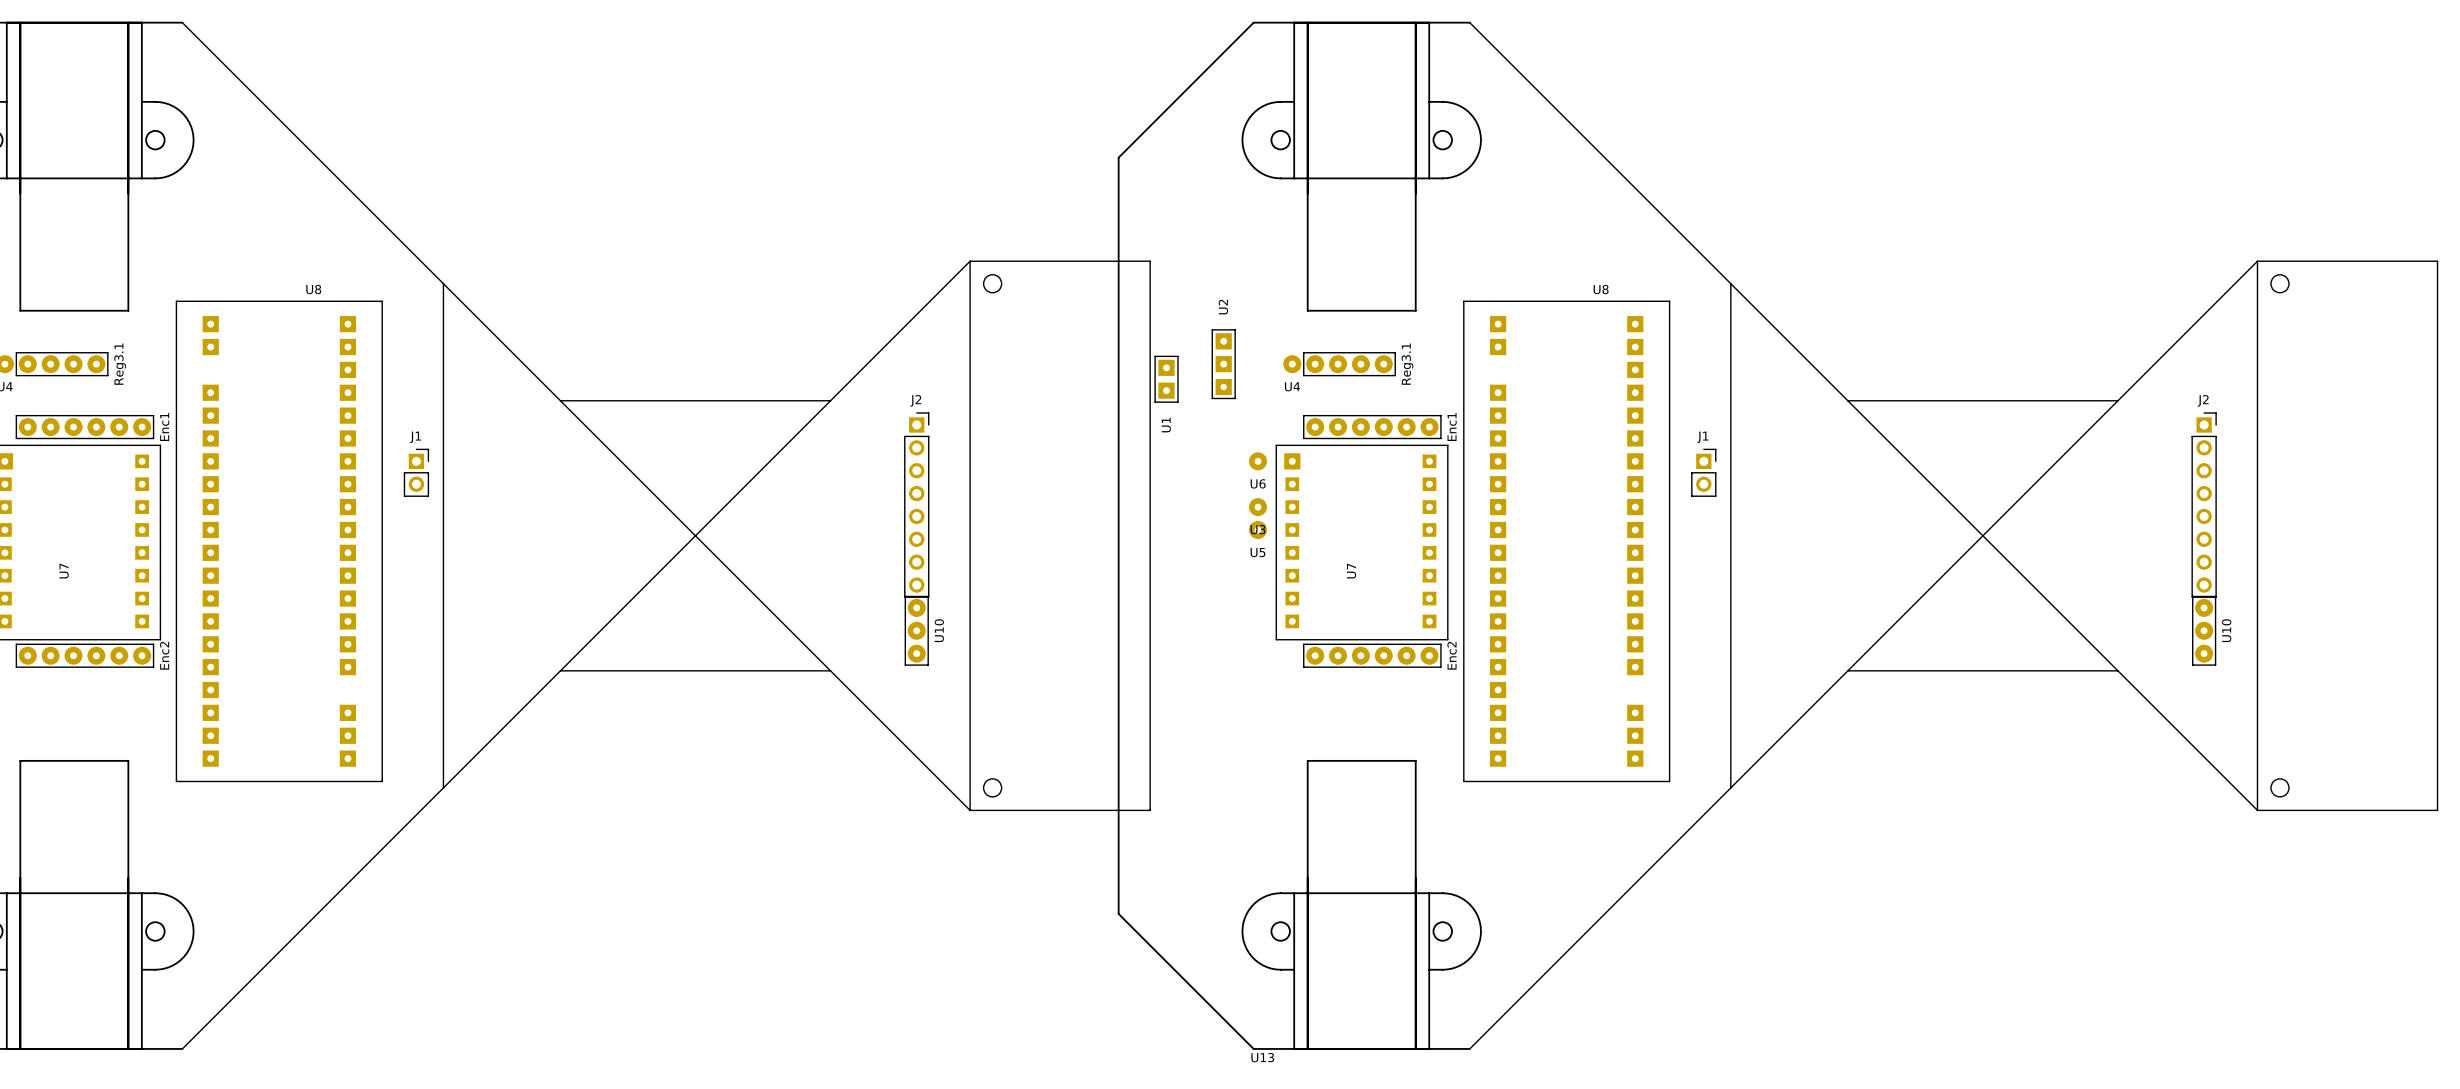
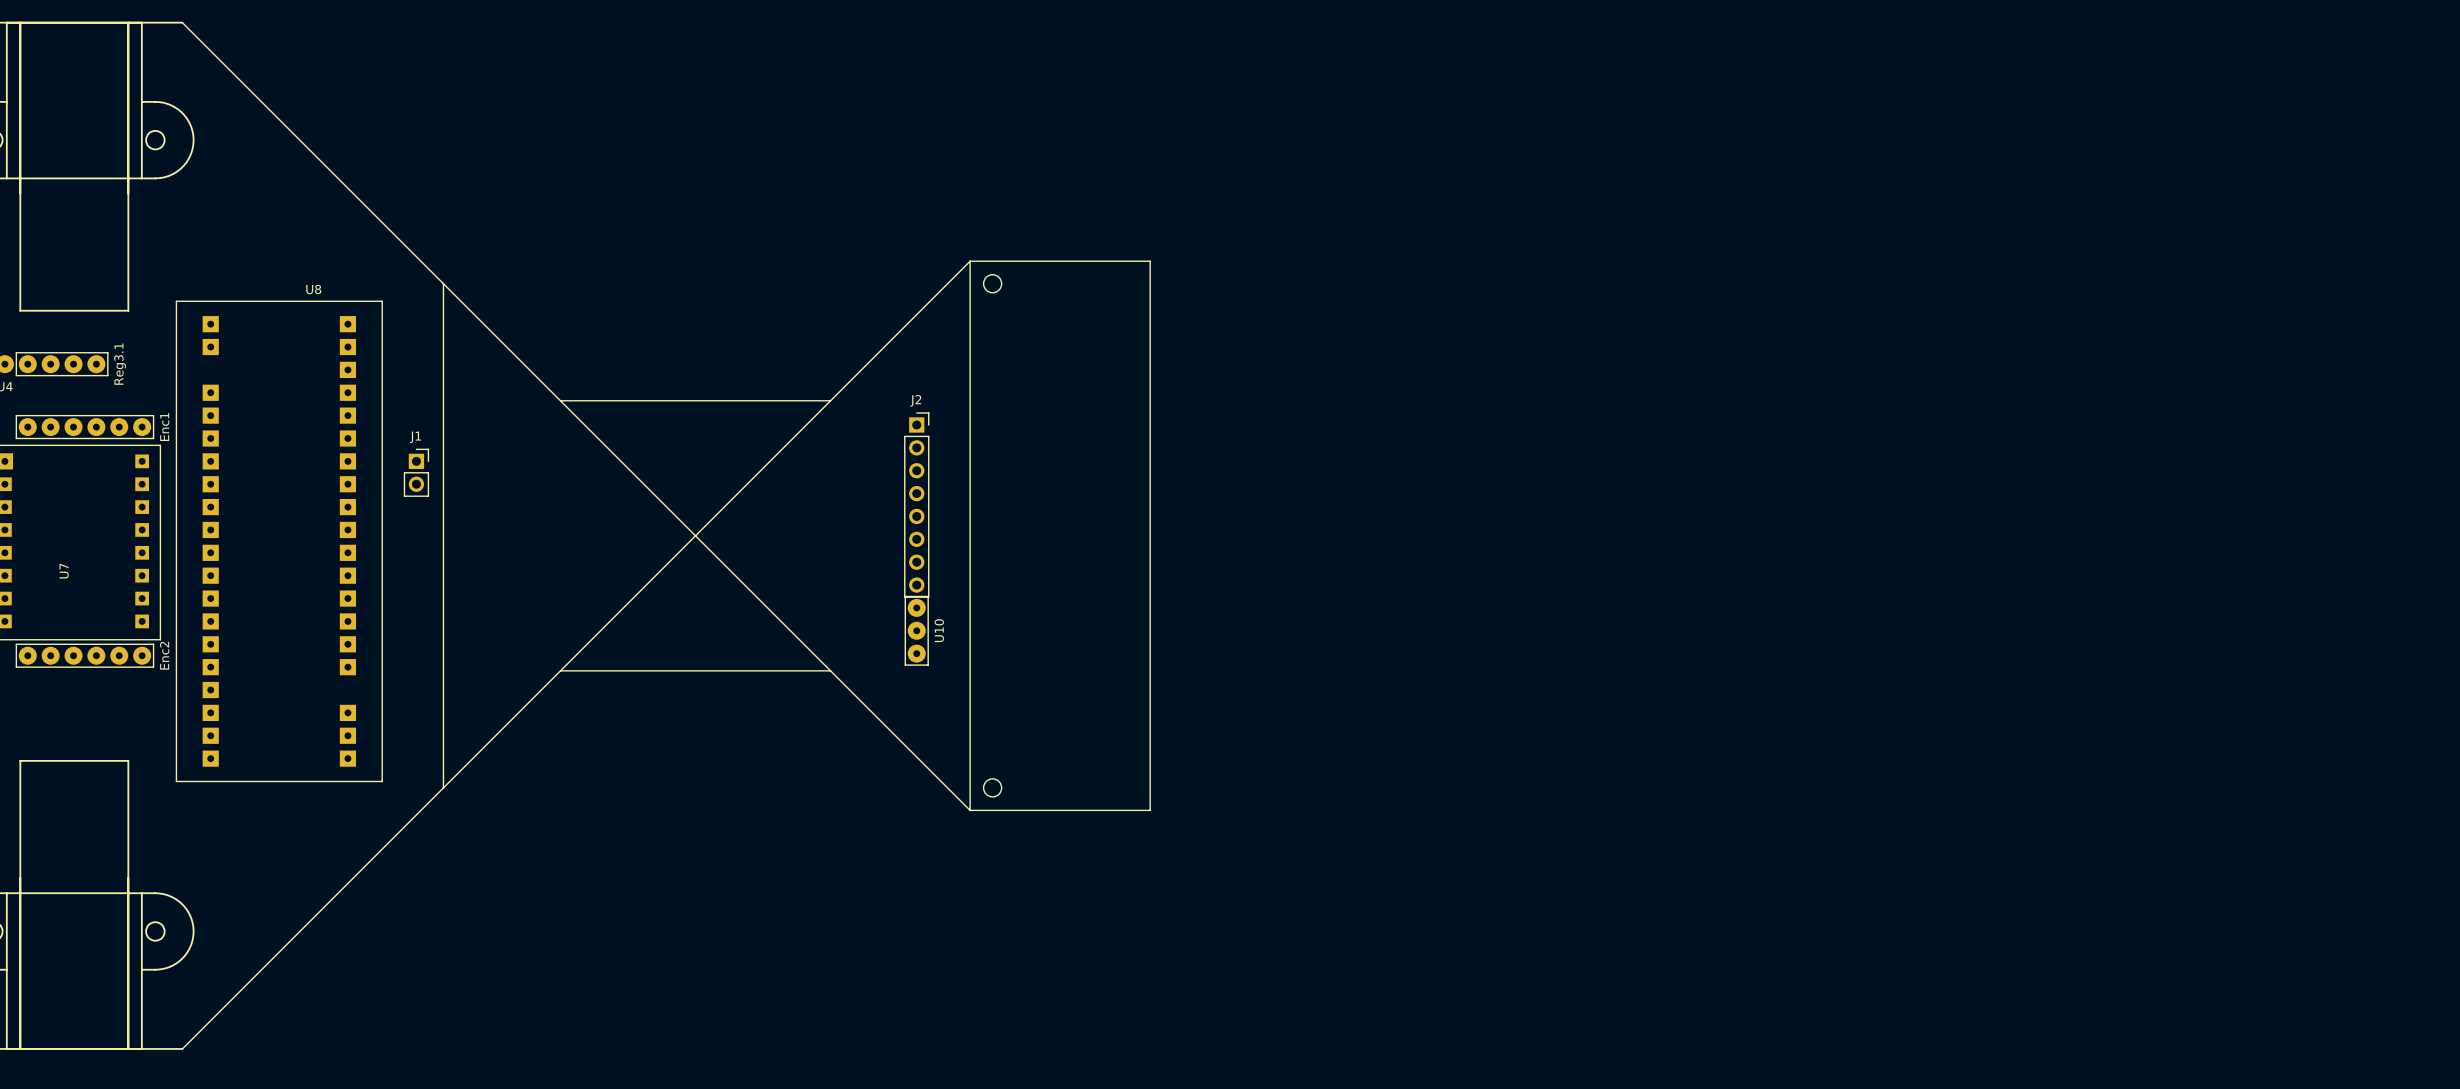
U2: (1223, 364) -> none
U4: (1292, 364) -> none
Reg3.1: (1349, 364) -> none
U1: (1166, 379) -> none
Enc1: (1372, 427) -> none
U6: (1258, 461) -> none
J1: (1703, 472) -> none
J2: (2204, 505) -> none
U3: (1258, 507) -> none
U5: (1258, 529) -> none
U13: (1777, 535) -> none
U8: (1566, 541) -> none
U7: (1362, 542) -> none
U10: (2204, 630) -> none
Enc2: (1372, 655) -> none

